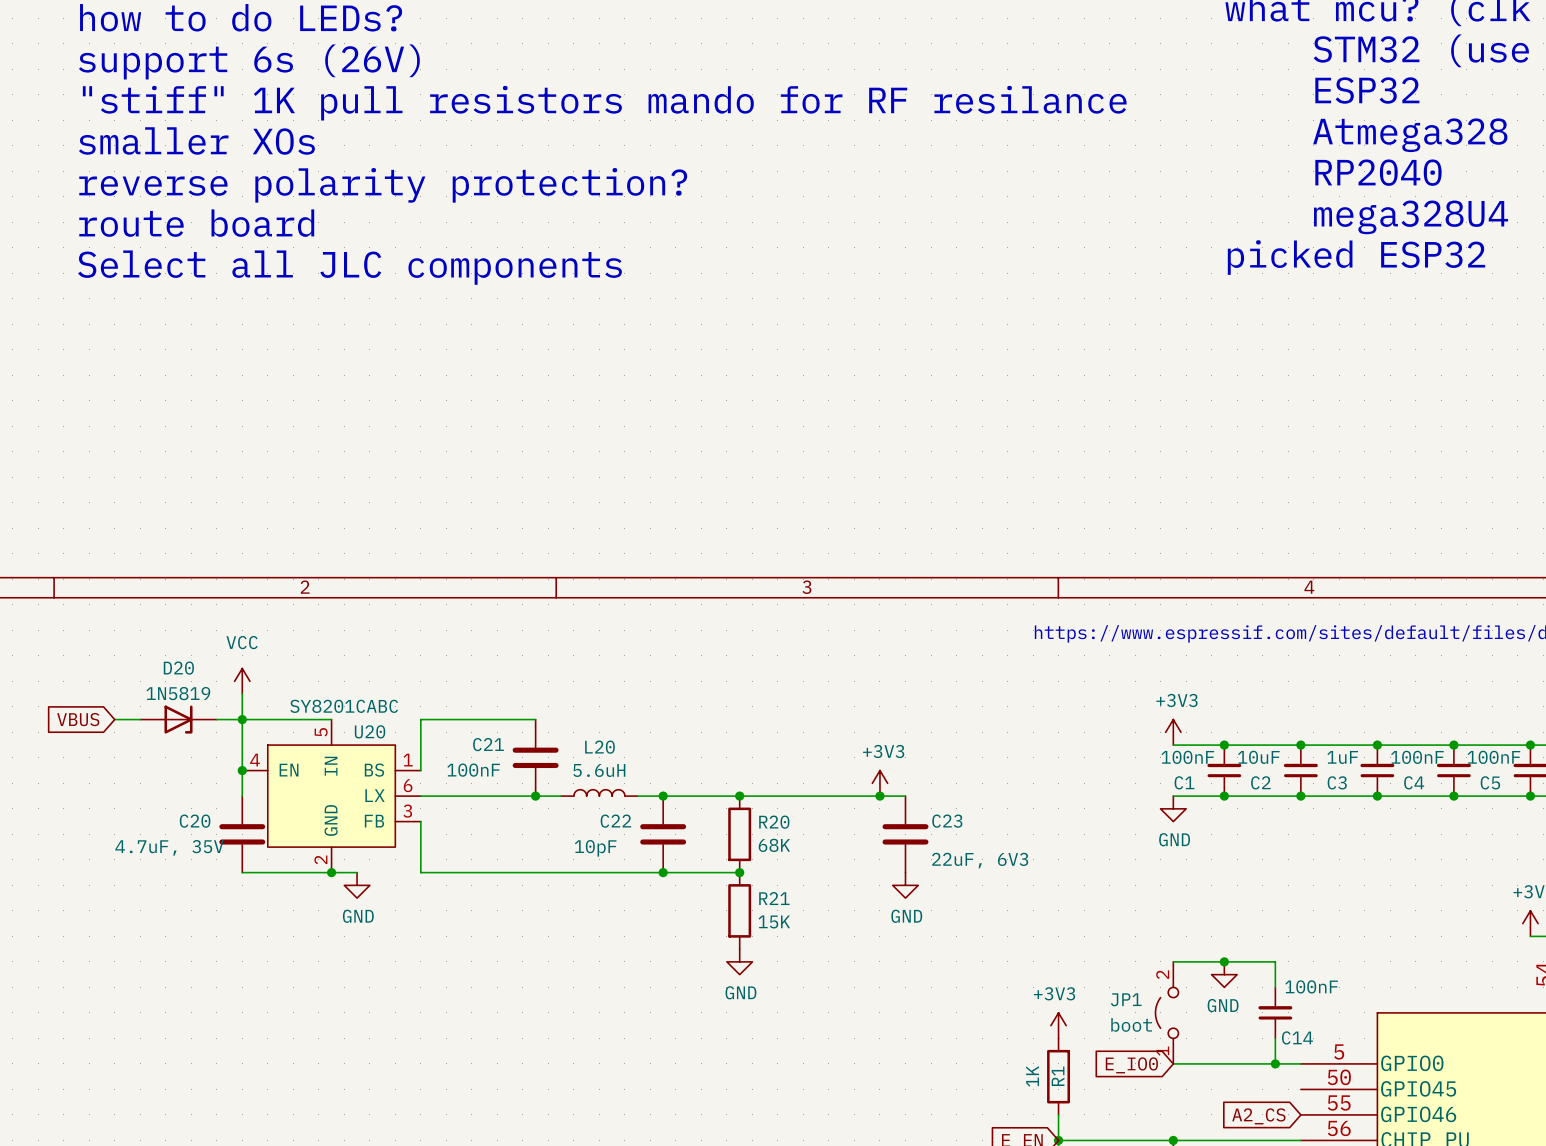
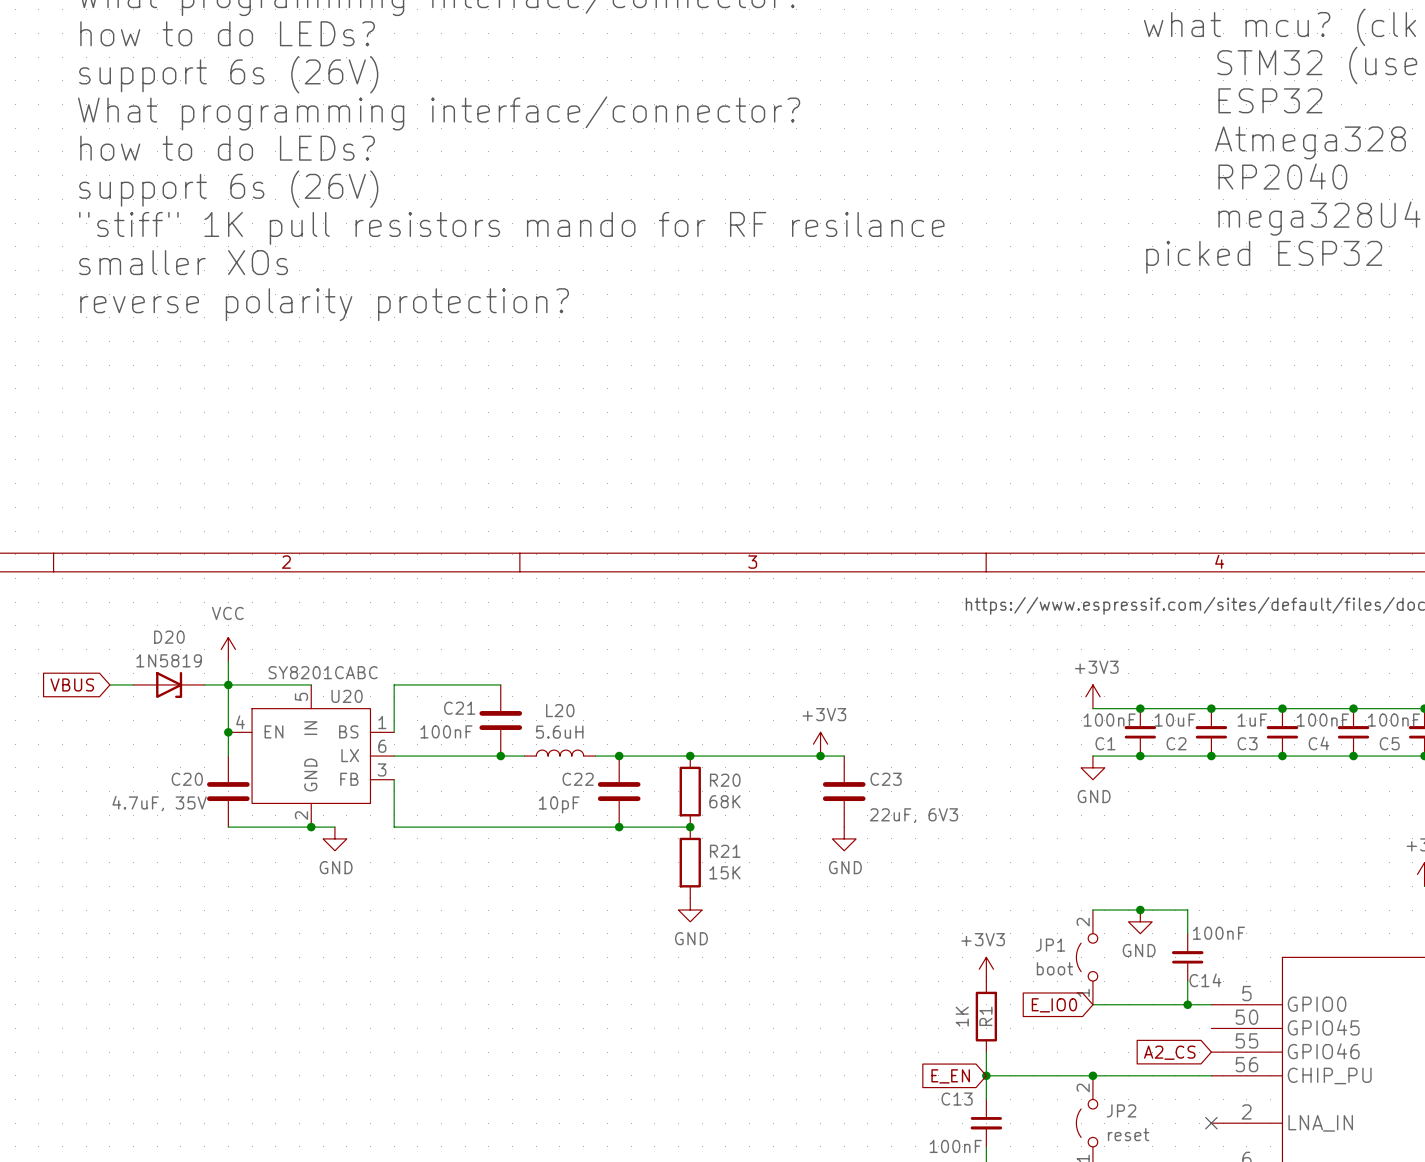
text: "stiff" 1K pull resistors mando for RF resilance (604, 103) -> What programming interface/connector? (439, 113)
text: smaller XOs (196, 140) -> how to do LEDs? (227, 148)
text: reverse polarity protection? (383, 185) -> support 6s (26V) (228, 189)
text: route board (196, 223) -> "stiff" 1K pull resistors mando for RF resilance (511, 228)
text: Select all JLC components (350, 267) -> smaller XOs (183, 262)
text: none -> reverse polarity protection? (324, 304)

